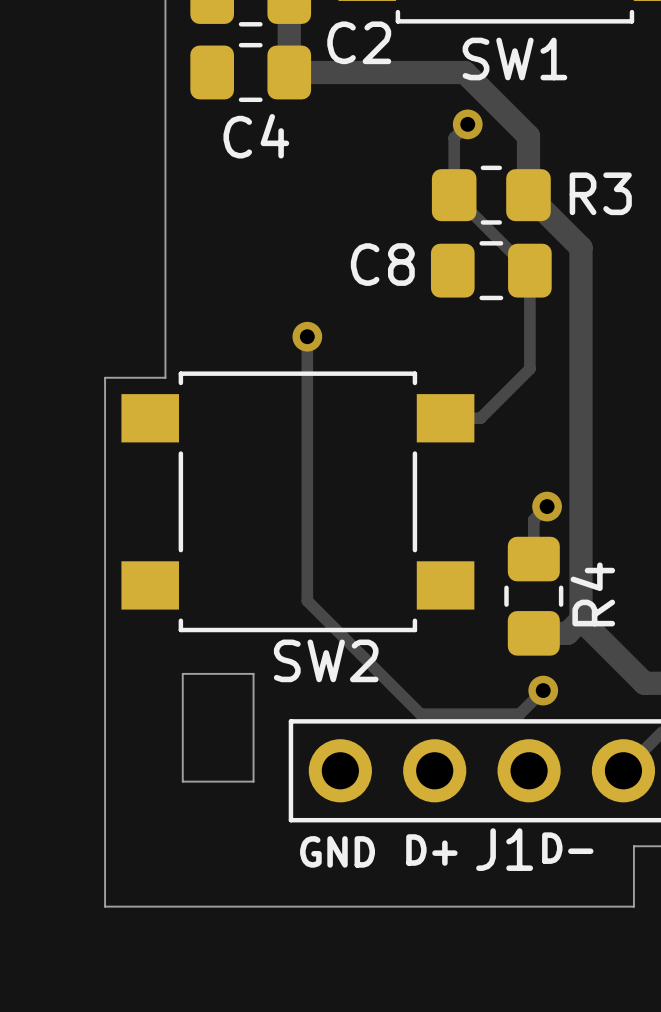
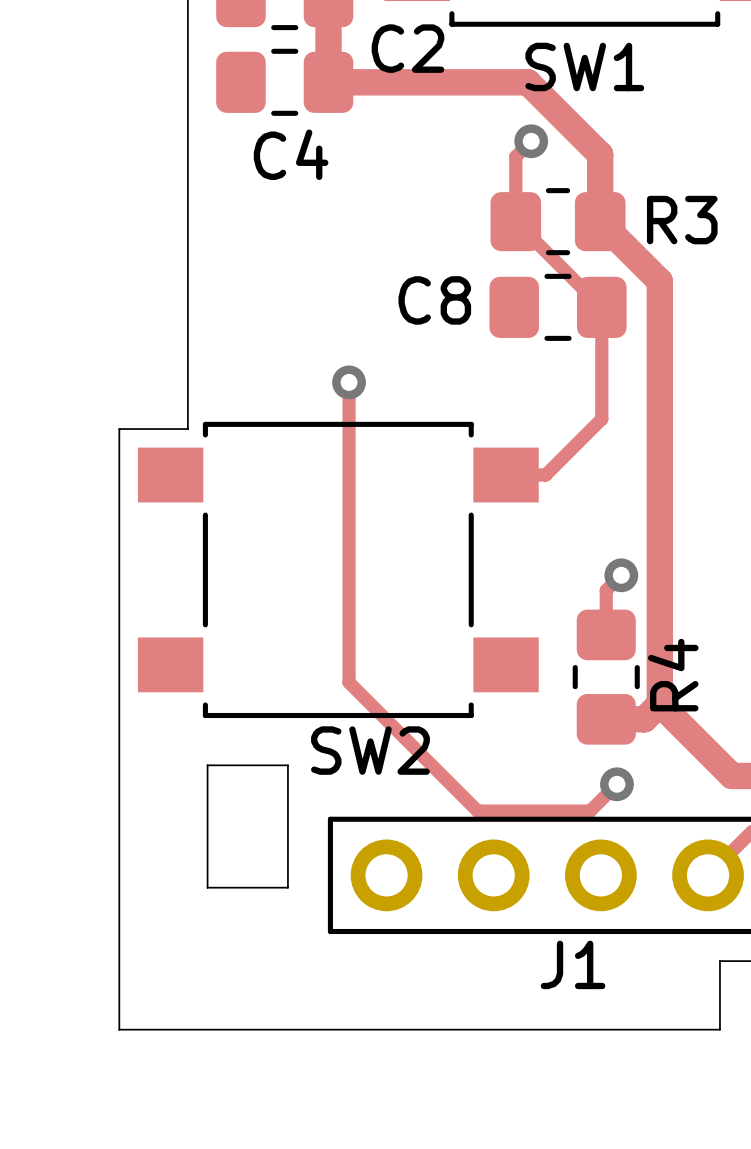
text: D- (567, 848) -> none
text: D+ (431, 850) -> none
text: GND (337, 851) -> none

